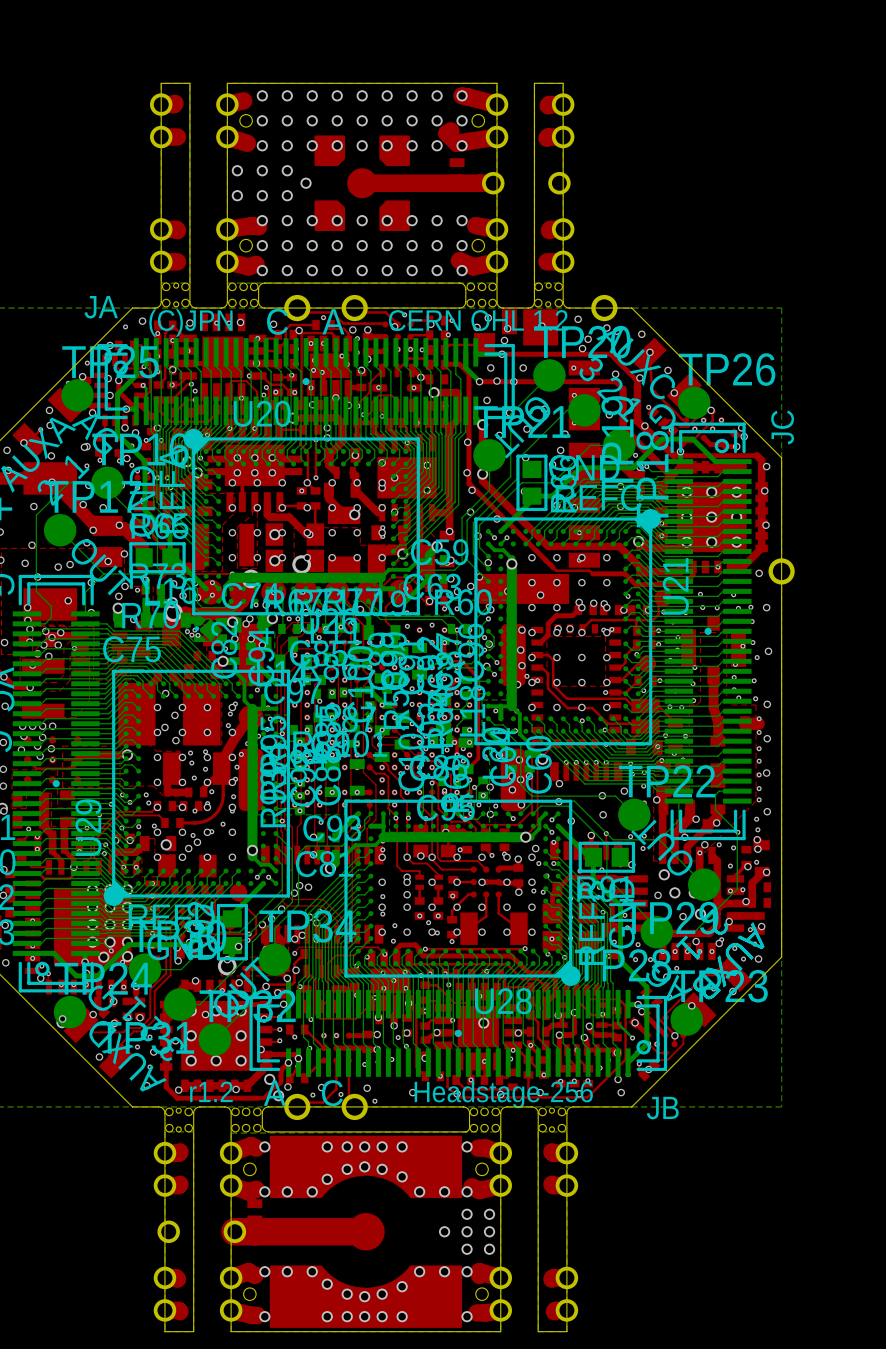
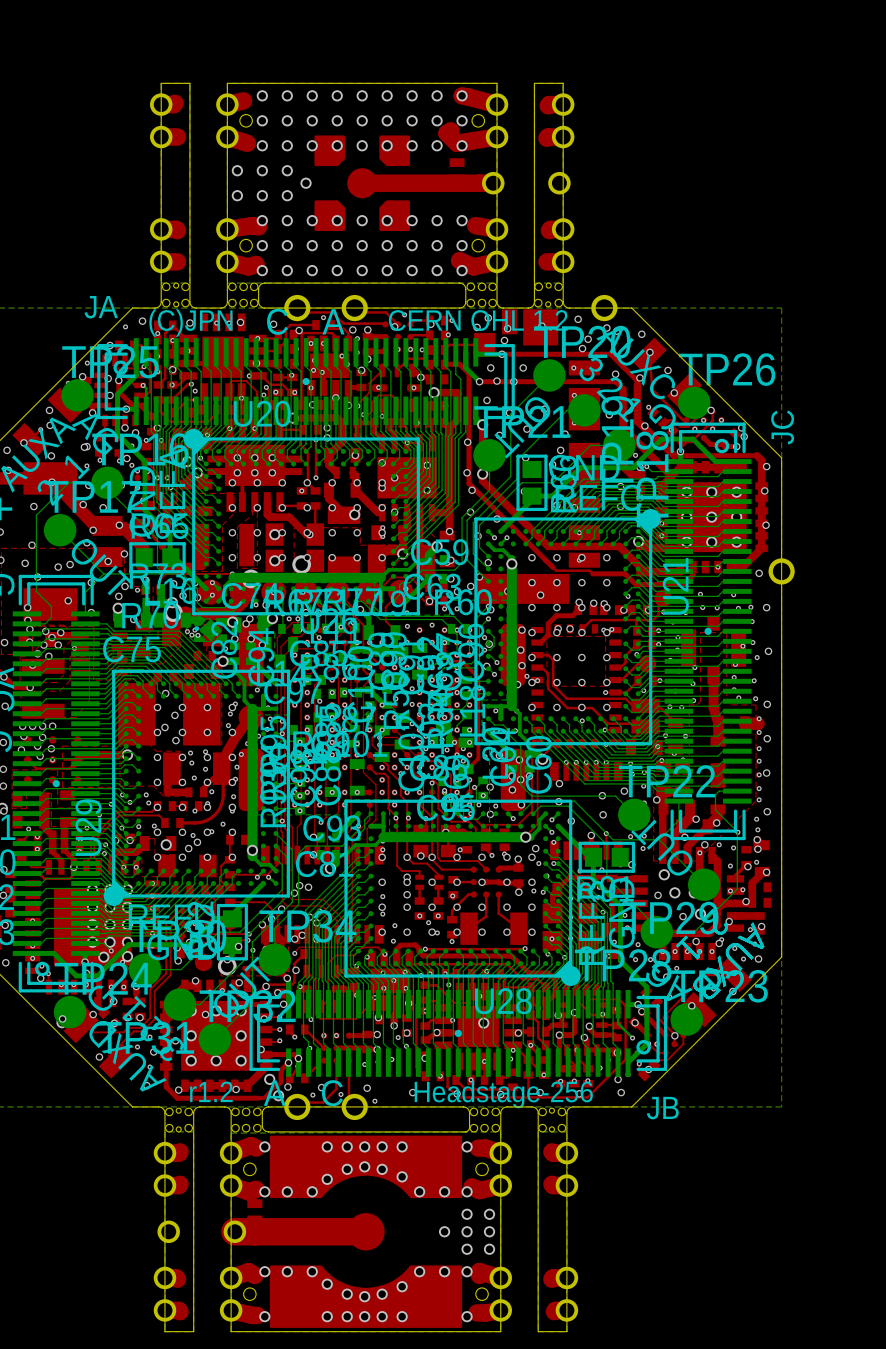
top track: none -> (229, 839) (229, 859) (221, 866) (221, 881) (229, 887)
part: none -> (237, 839)
top track: none -> (277, 855) (277, 864) (267, 874) (229, 874)
part: none -> (229, 867)
part footprint: [229, 883, 248, 902] -> [224, 883, 235, 906]
top track: (238, 892) (238, 899) (256, 917) (256, 933) (249, 940) -> none
top track: none -> (229, 902) (264, 902) (277, 915) (277, 934)
via: none -> (252, 950)
part: none -> (203, 962)

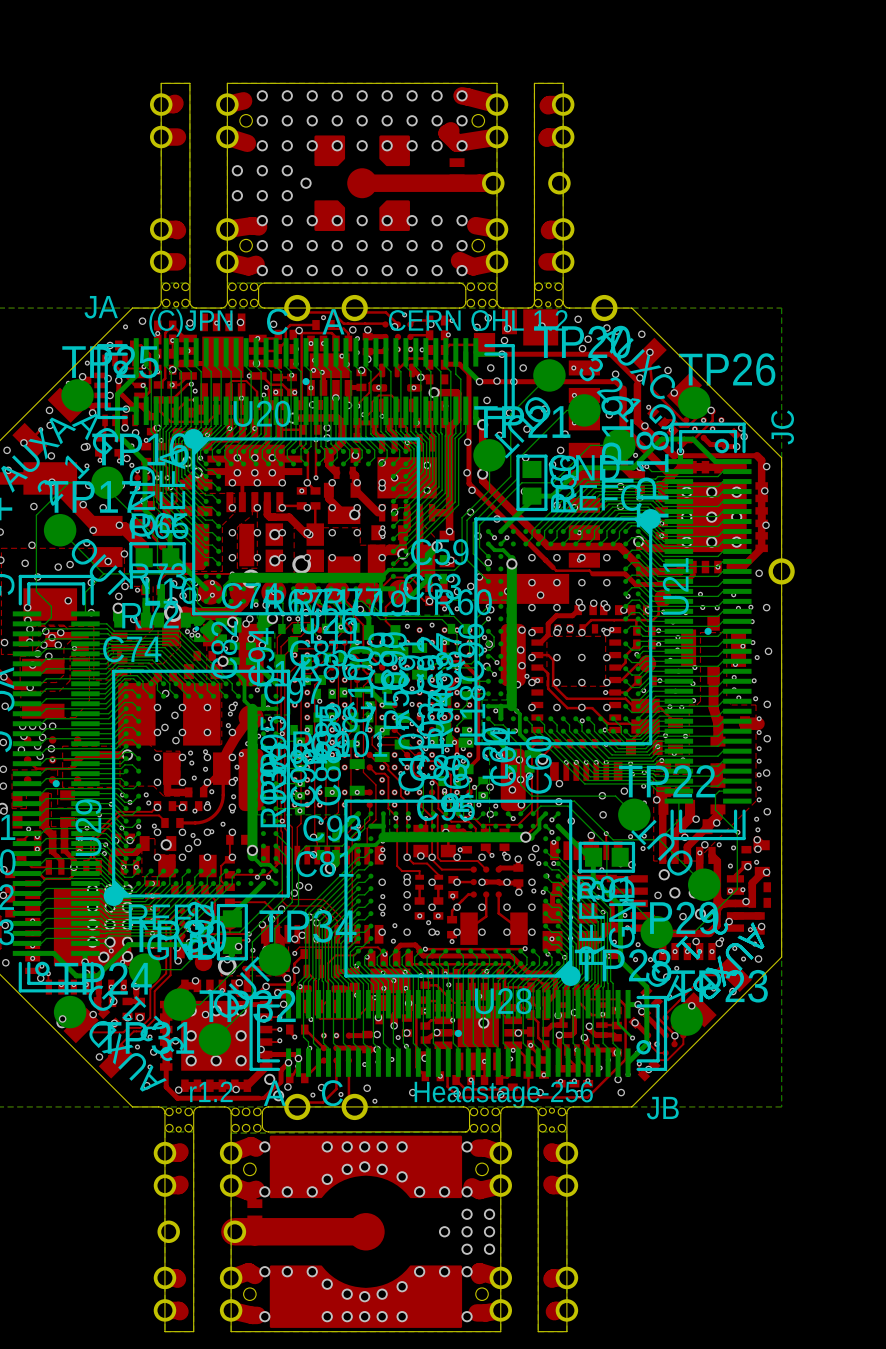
R70 name: R70 (150, 615) -> R72 (150, 615)
C75 name: C75 (132, 649) -> C74 (132, 649)

